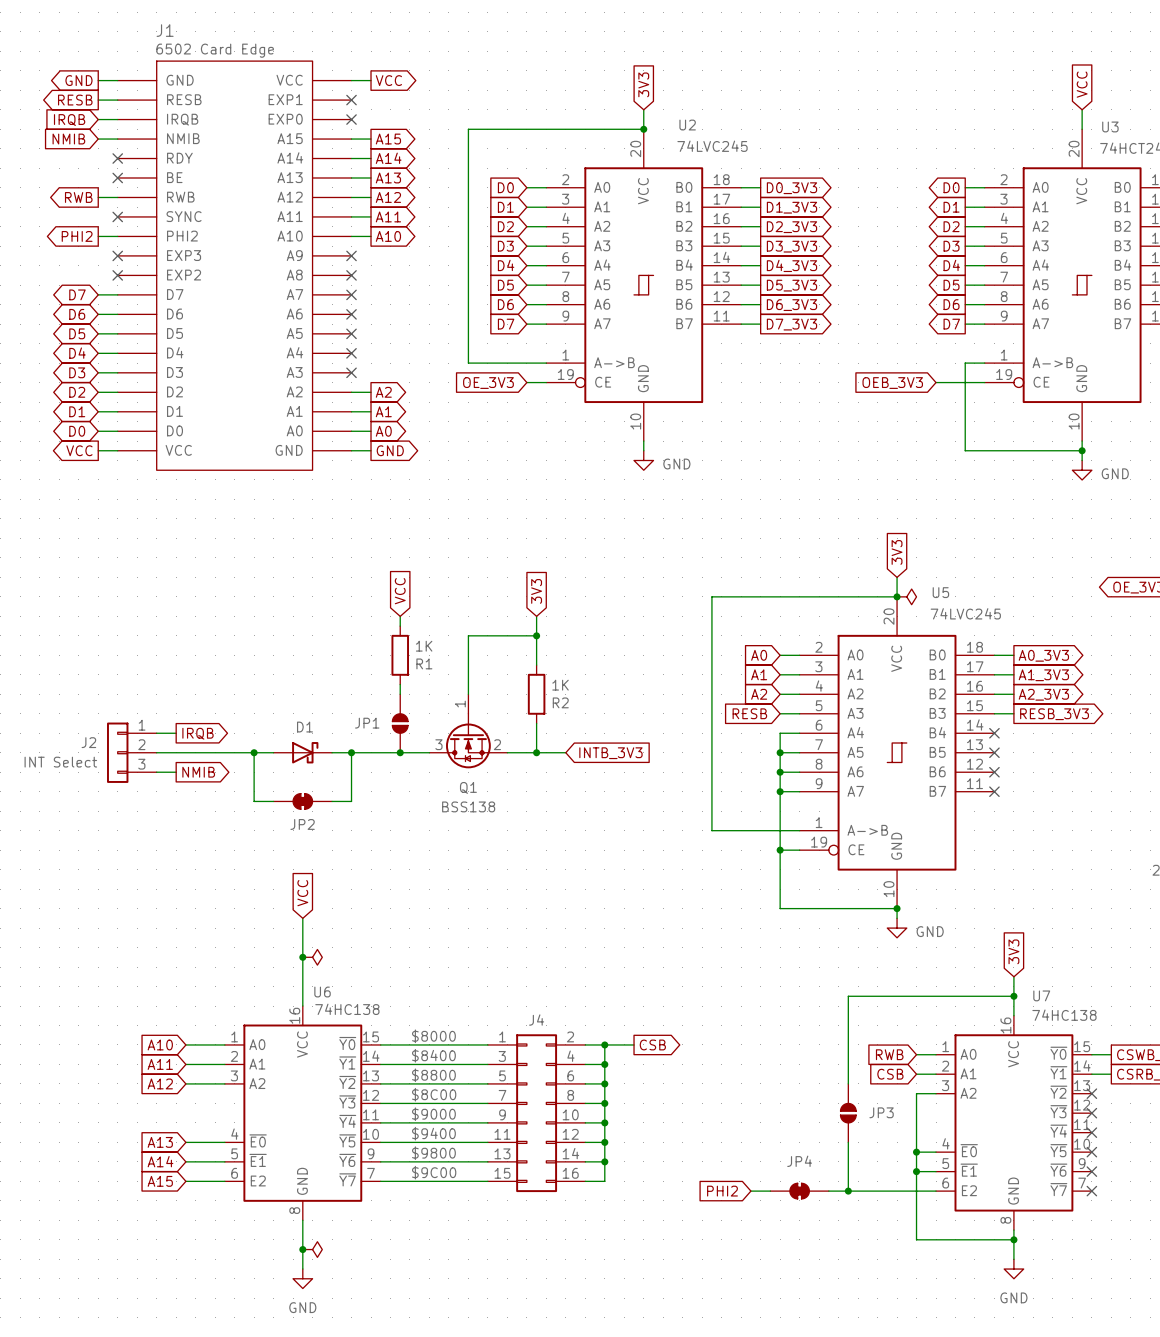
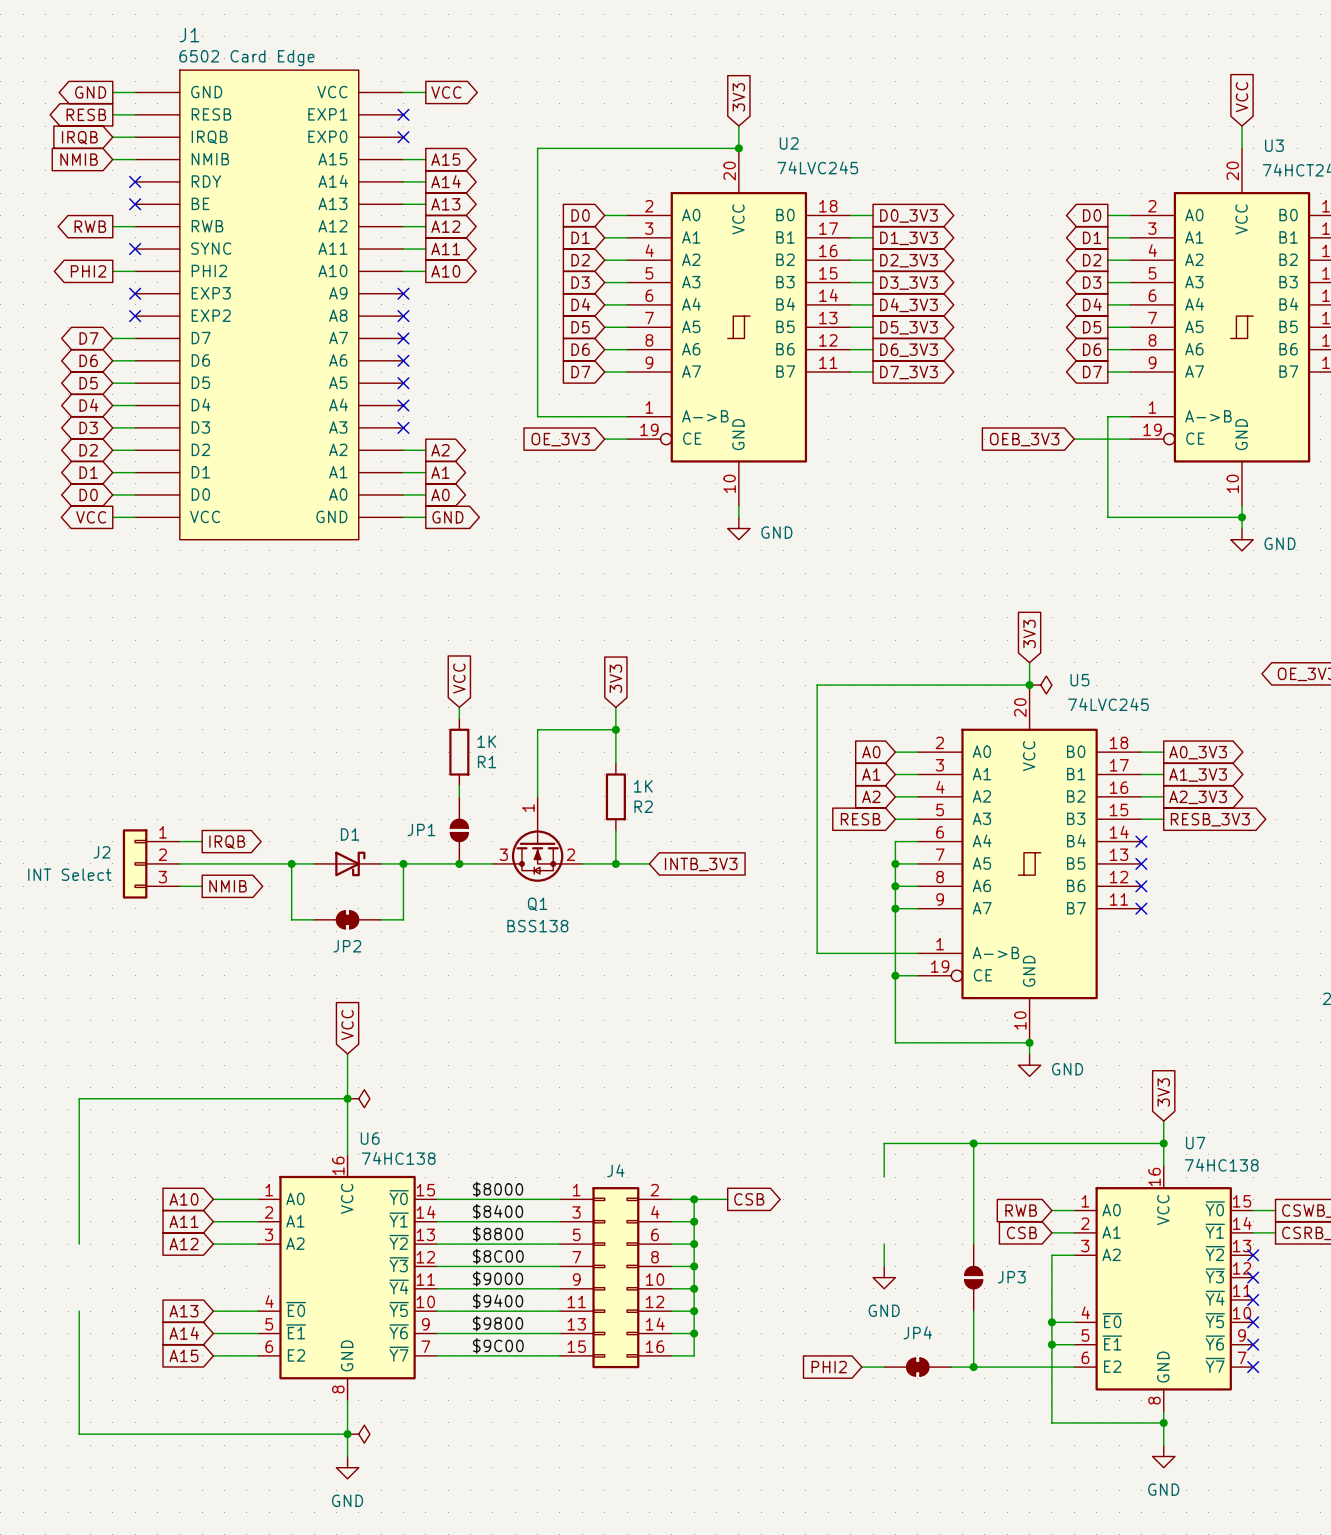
wire: none -> (347, 1098) (79, 1098) (79, 1244)
wire: none -> (973, 1143) (884, 1143) (884, 1177)
junction: none -> (973, 1143)
wire: none -> (884, 1244) (884, 1266)
power symbol: none -> GND (884, 1277)
wire: none -> (79, 1311) (79, 1434) (347, 1434)

